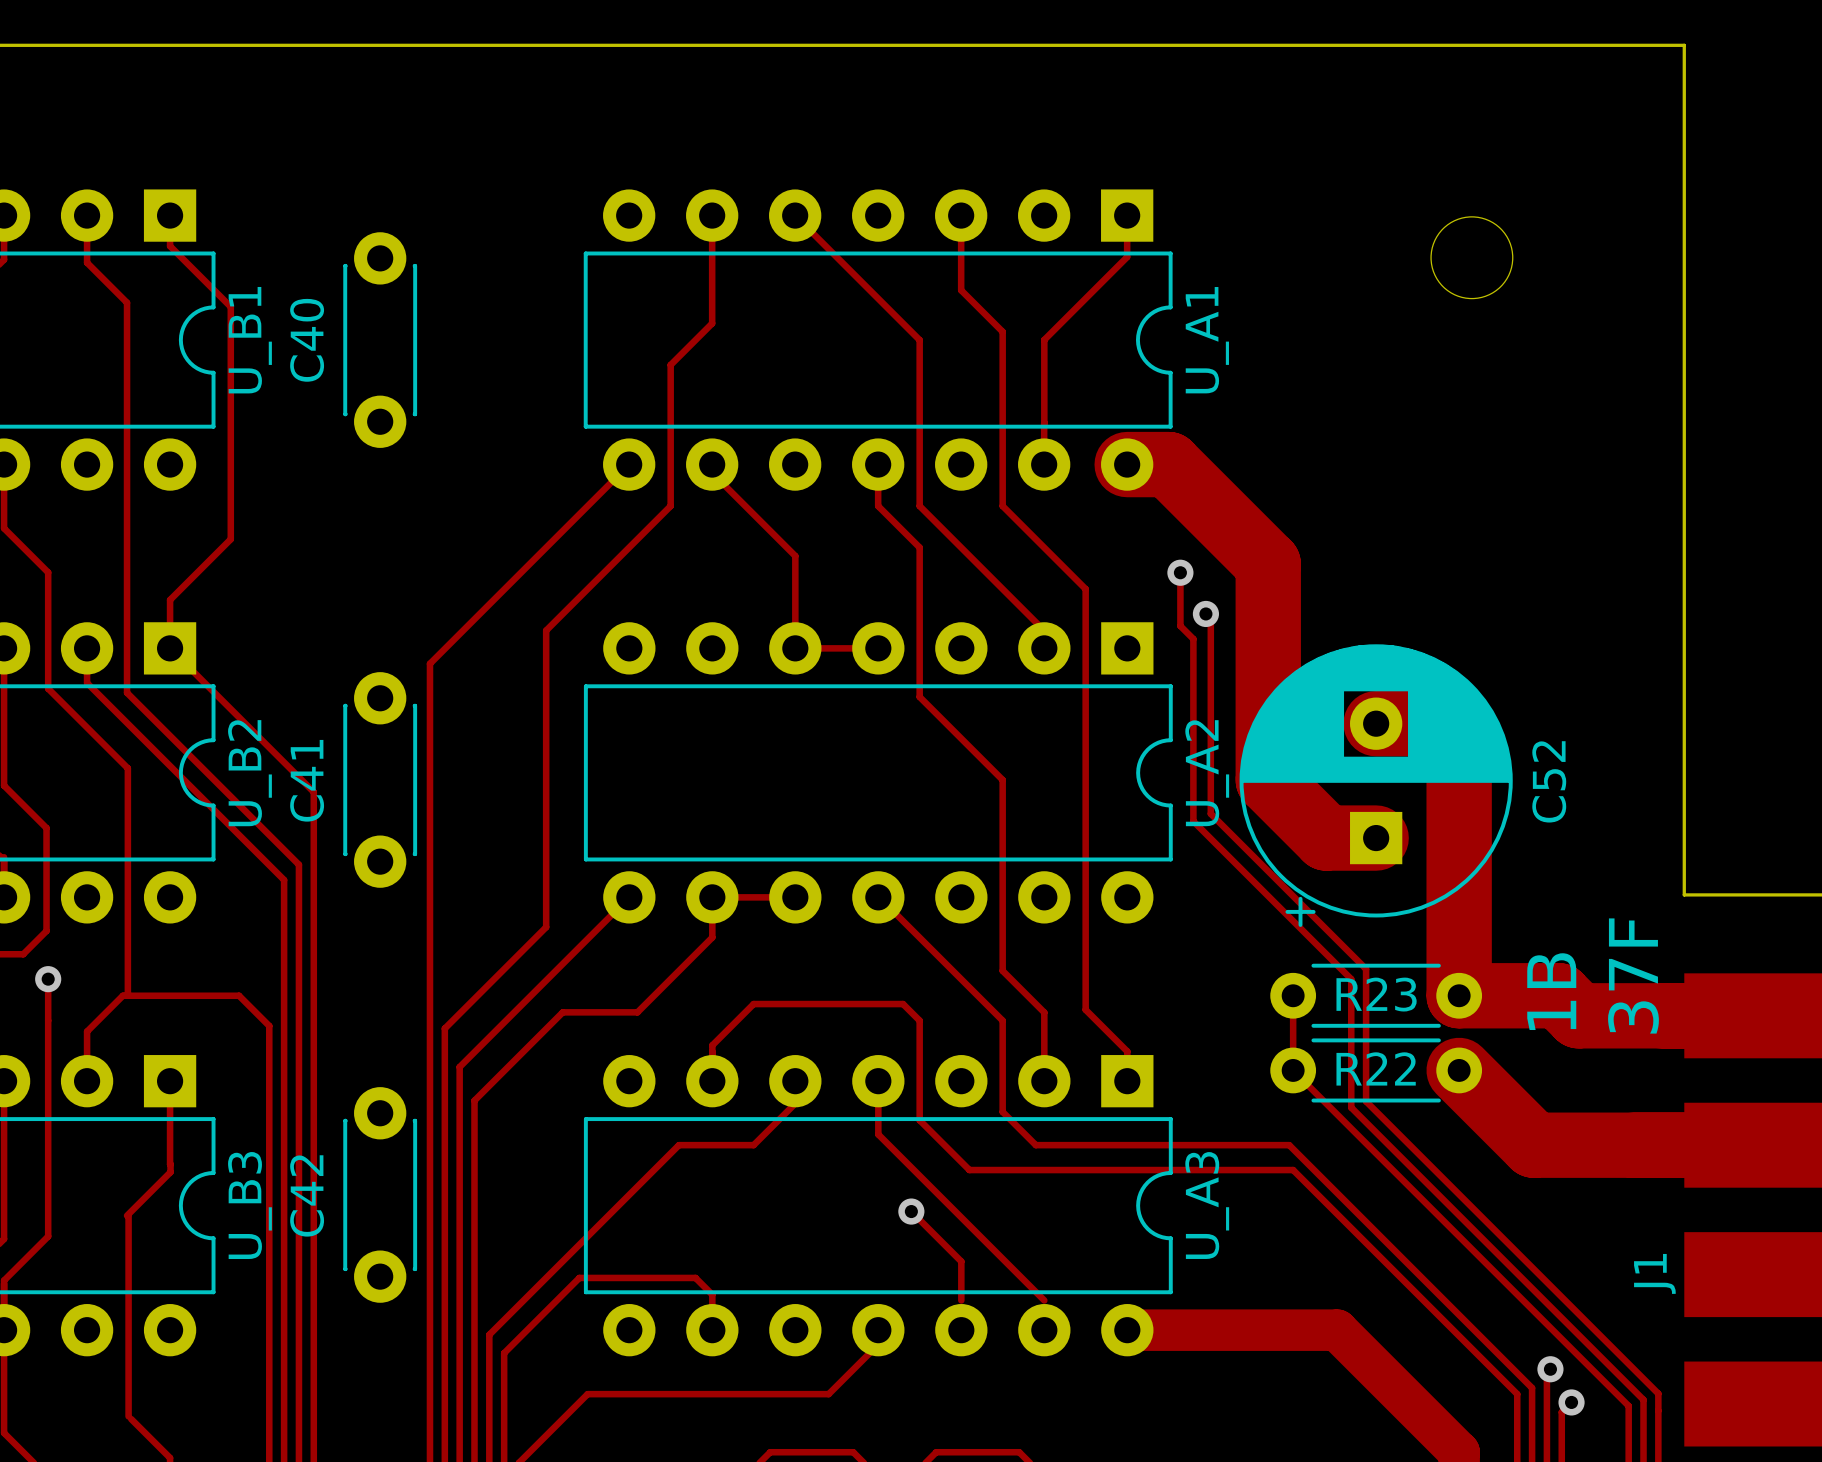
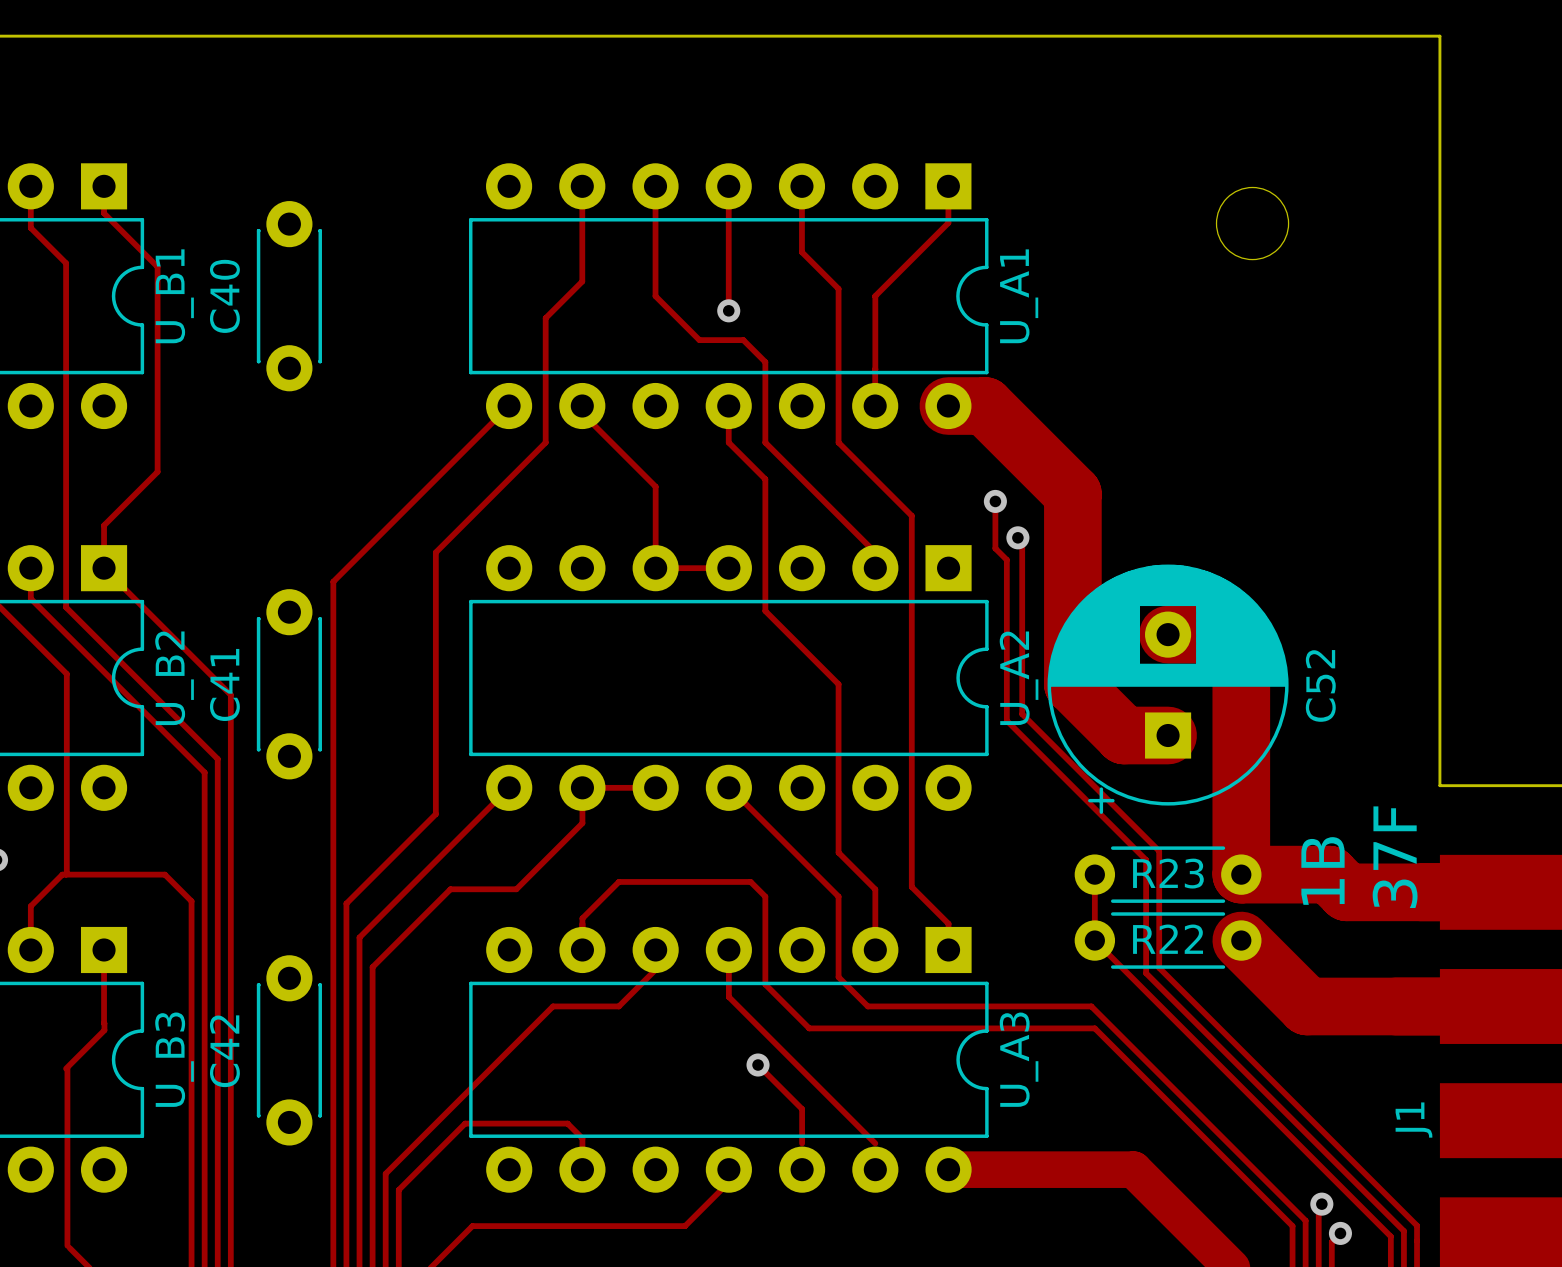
track: (795, 215) (919, 340) (919, 414) -> (655, 186) (655, 296) (699, 340) (743, 340) (765, 362)
track: none -> (728, 186) (728, 310)
via: none -> (728, 310)

